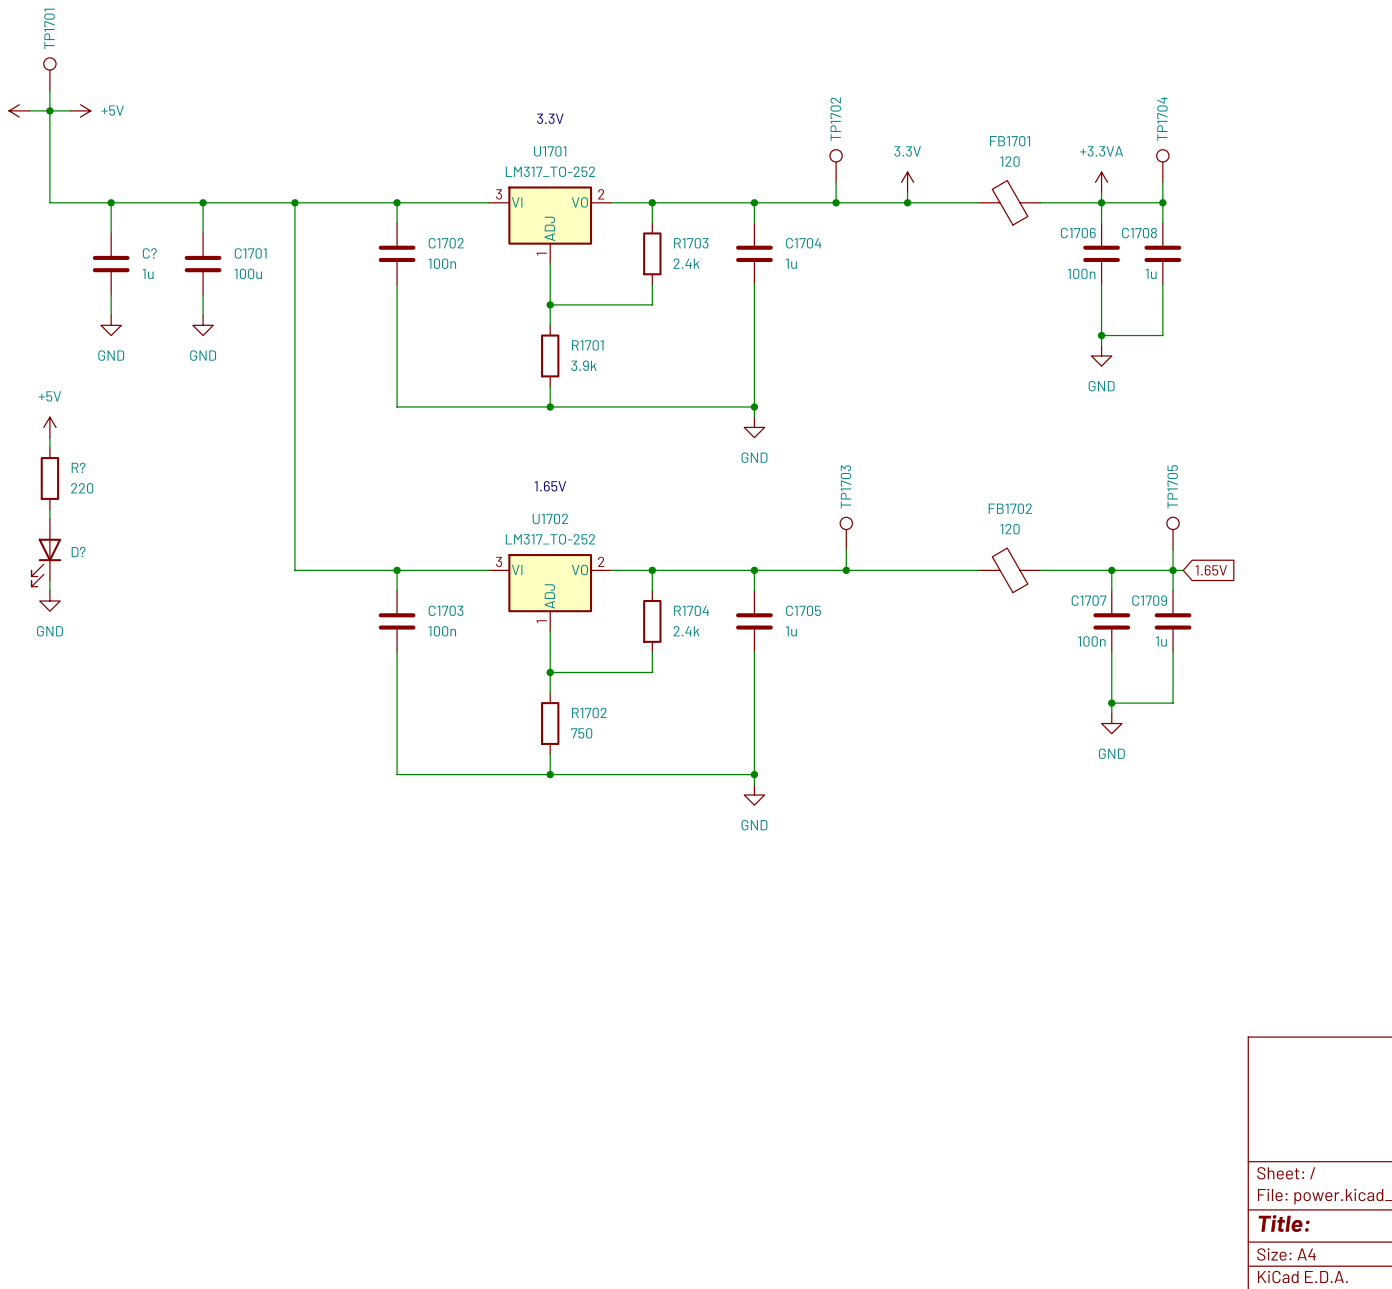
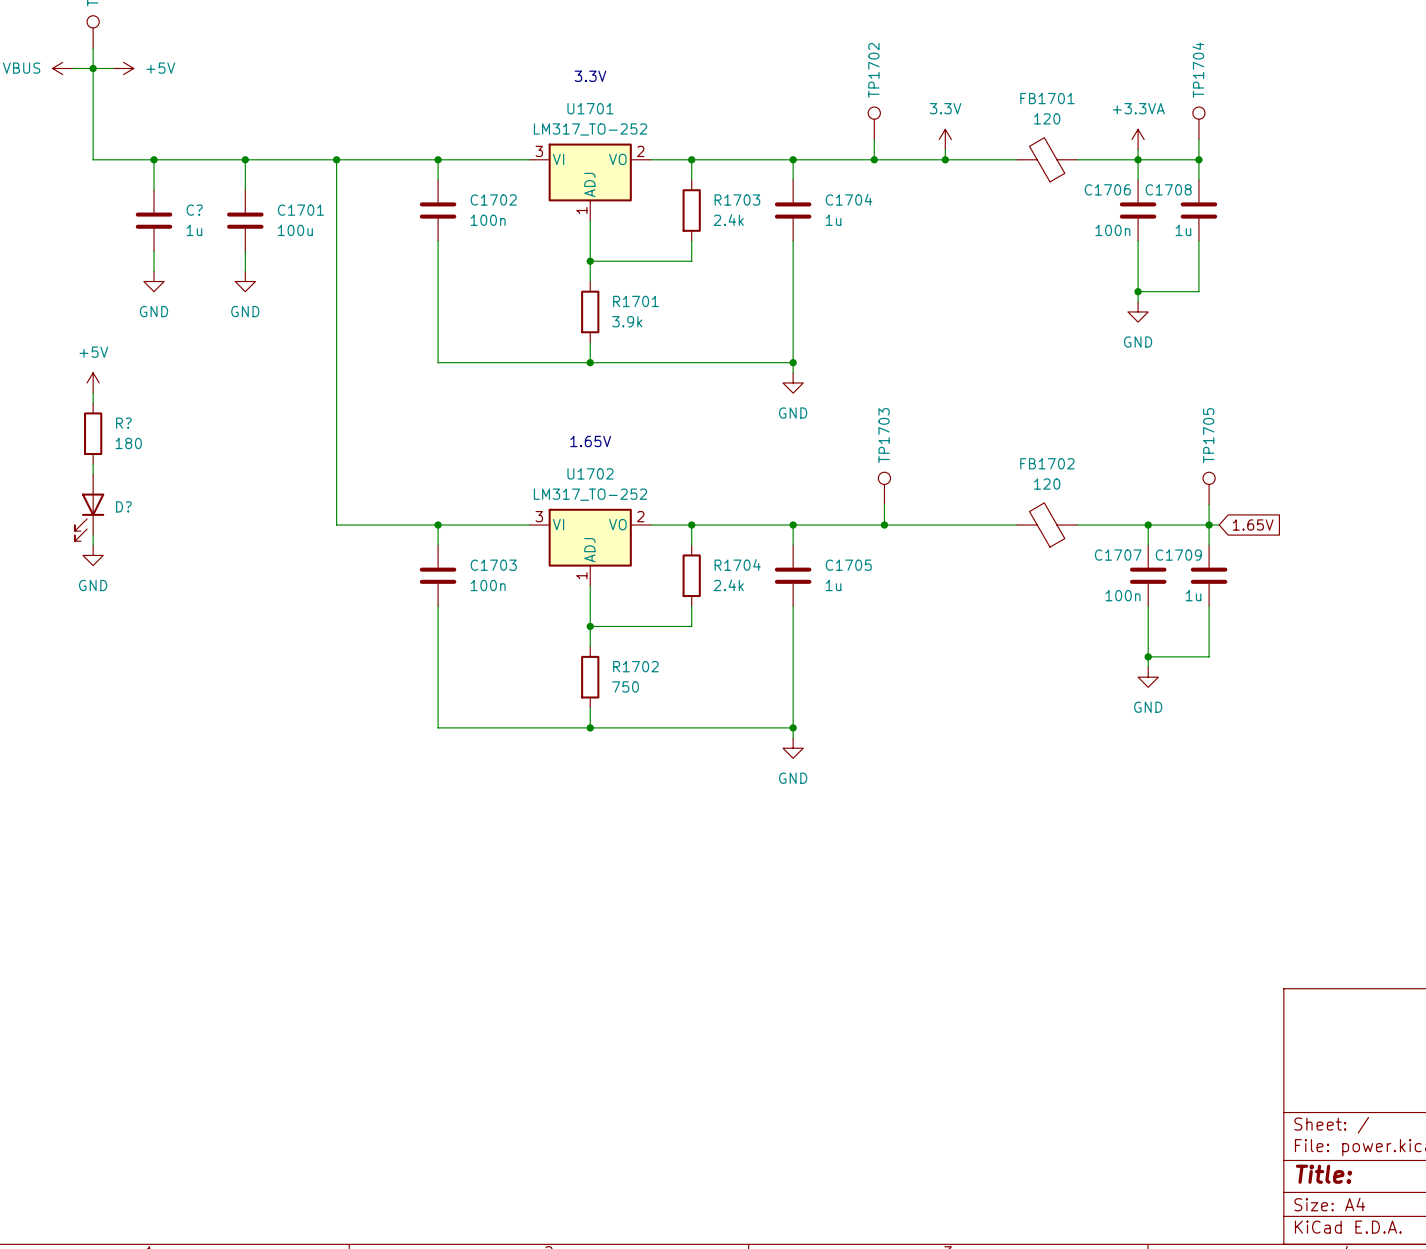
R? value: 220 (82, 488) -> 180 (128, 443)

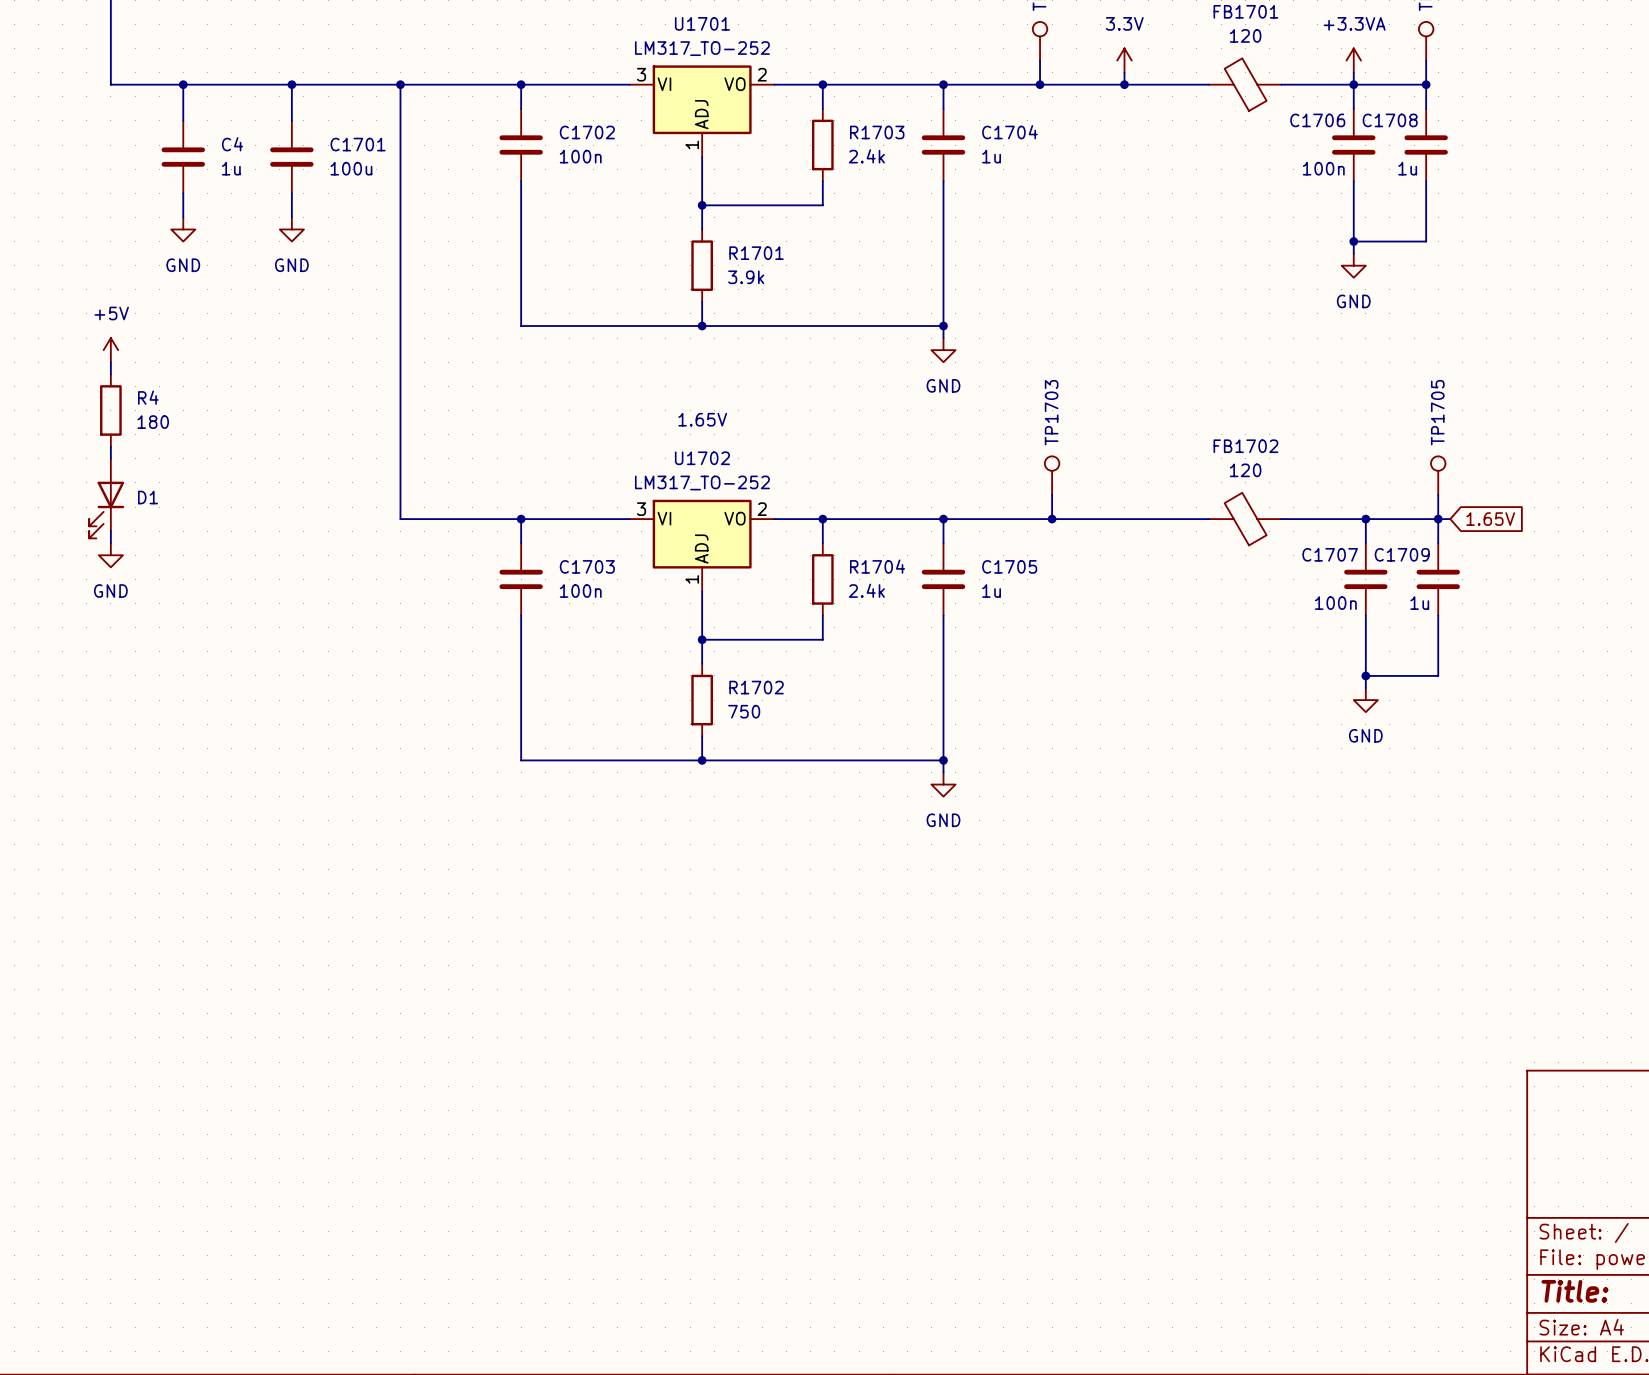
C? name: C? (194, 210) -> C4 (232, 144)
R? name: R? (123, 423) -> R4 (148, 397)
D? name: D? (123, 506) -> D1 (148, 497)

